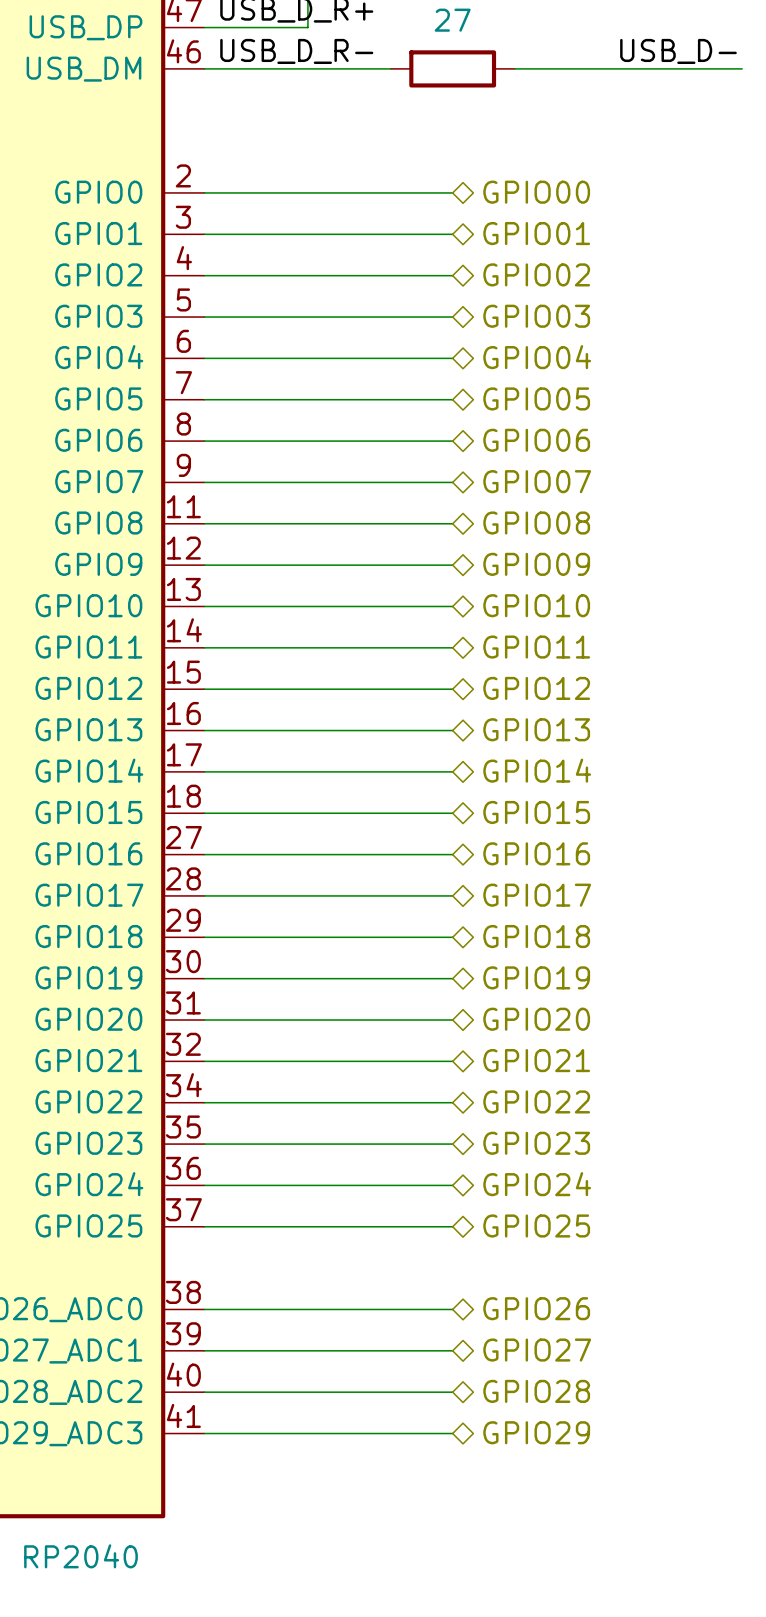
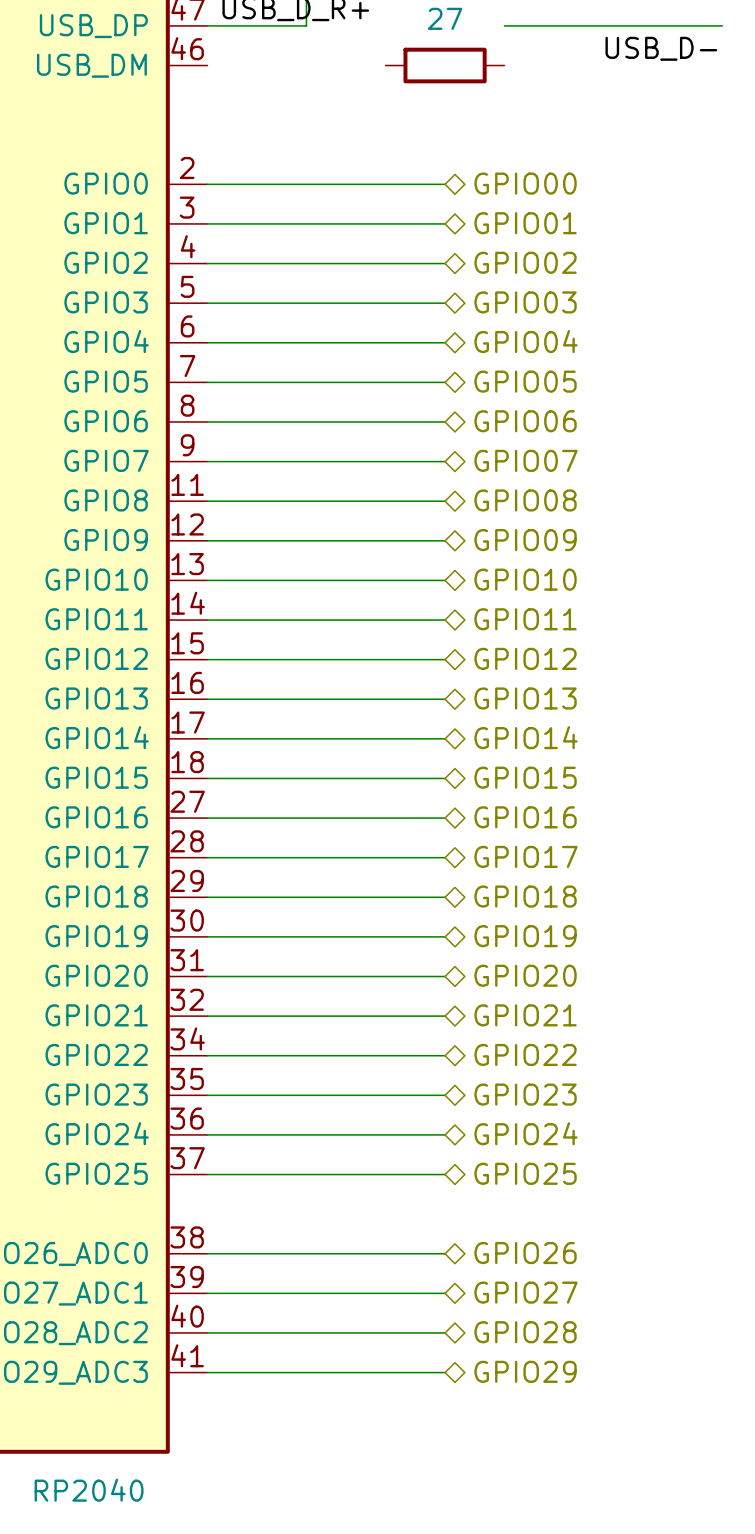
label: USB_D_R- (296, 51) -> none
wire: (204, 68) (390, 68) -> none
wire: (514, 68) (742, 68) -> (504, 25) (722, 25)

